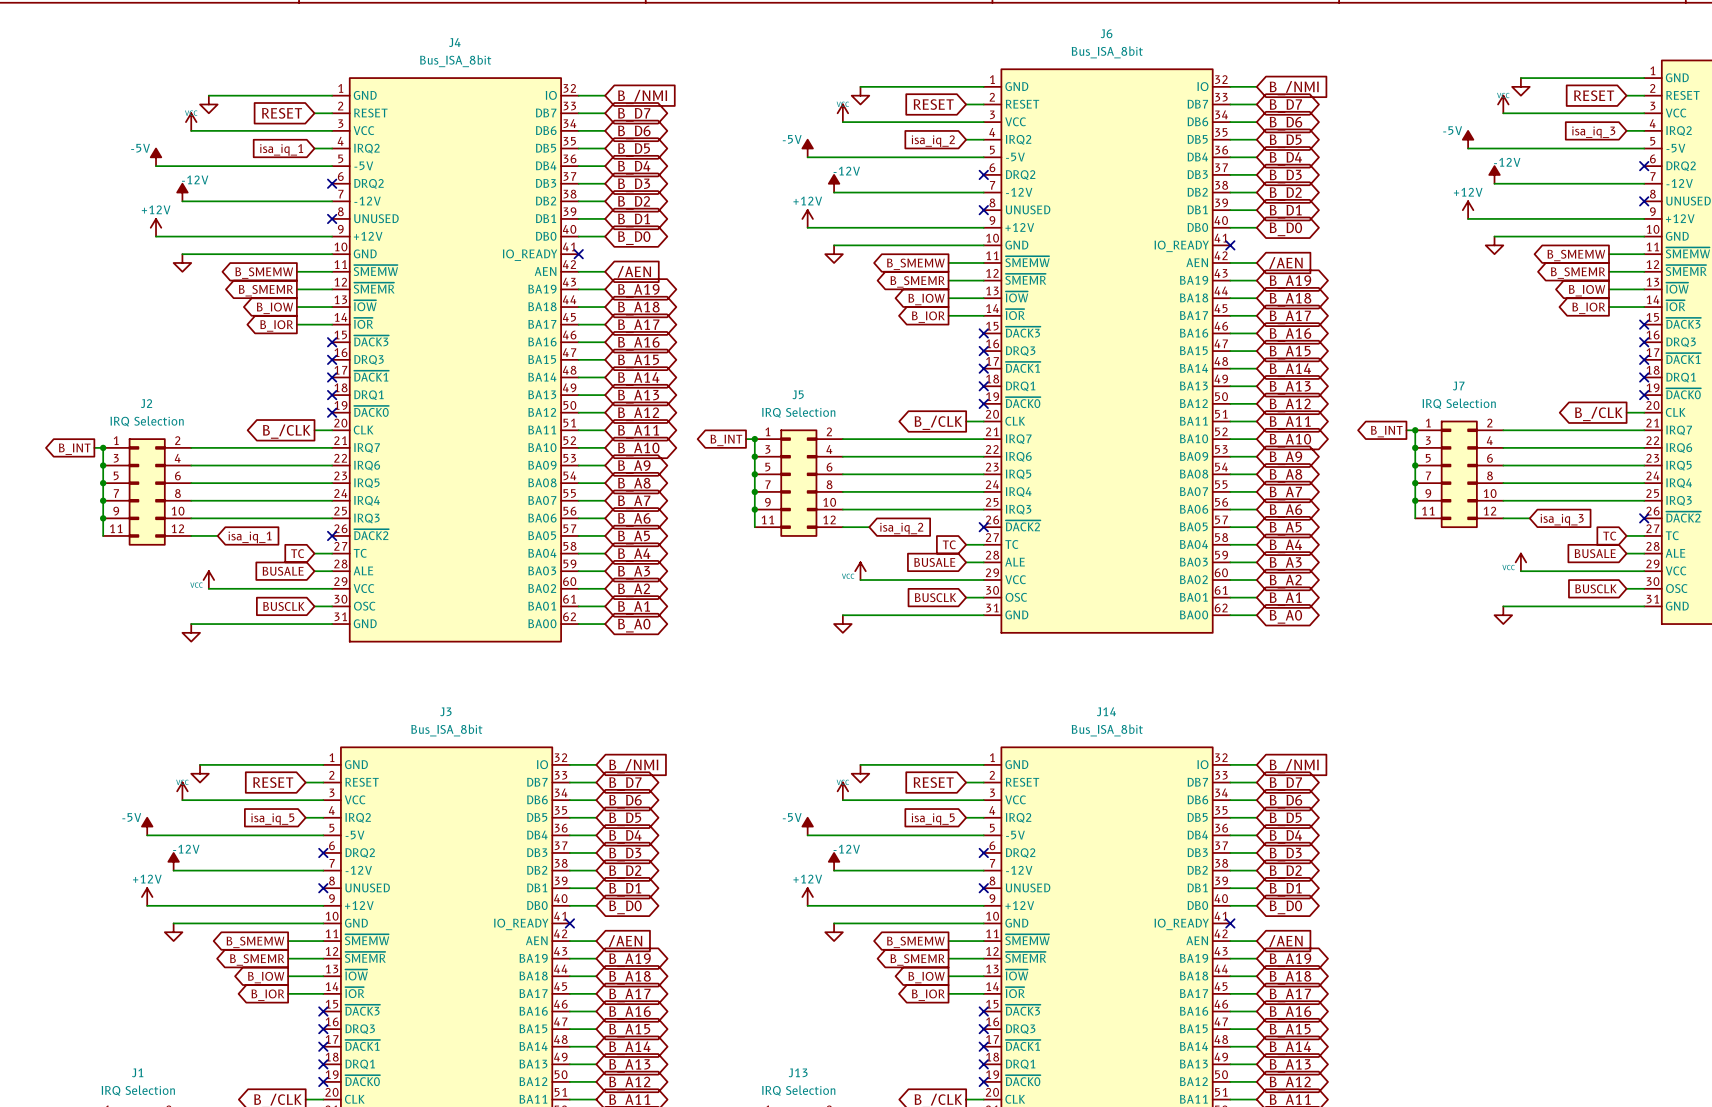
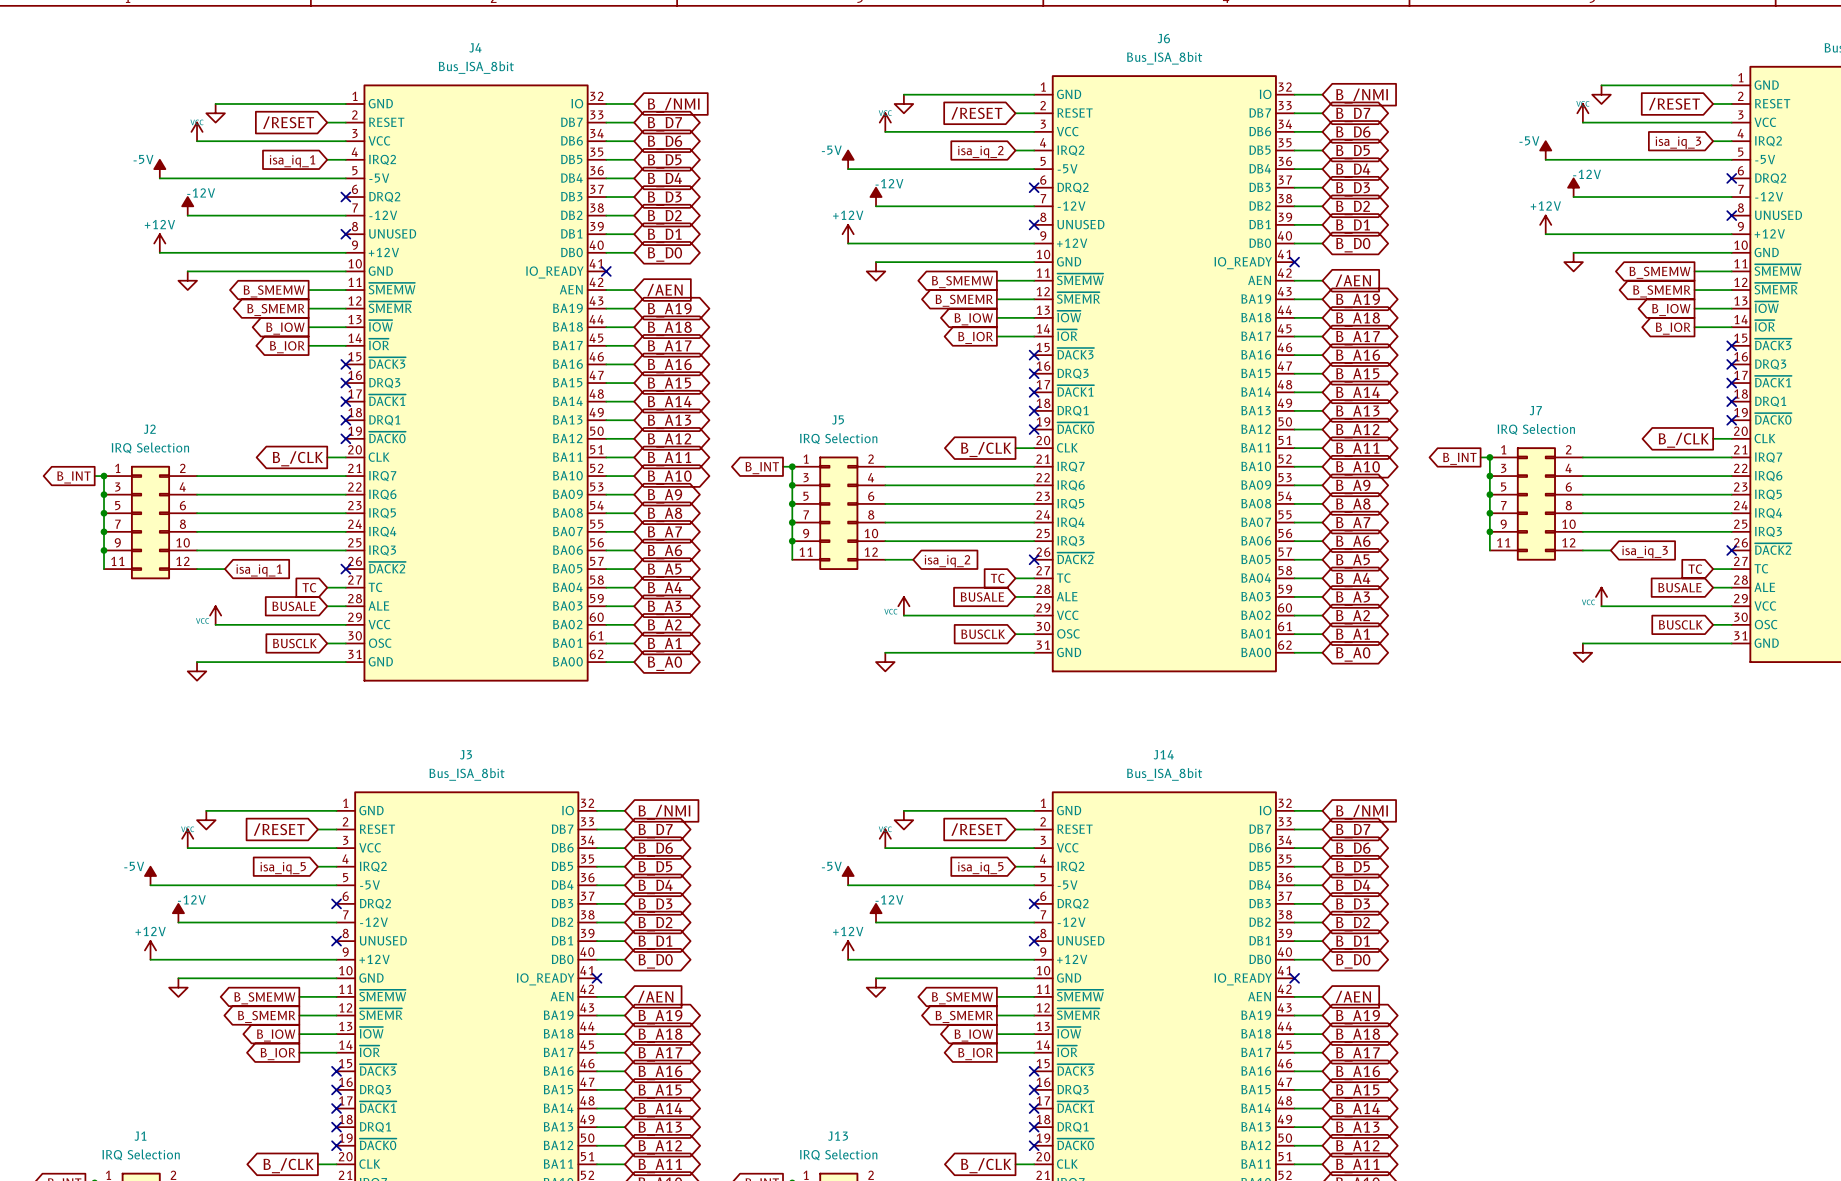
global label: RESET (1594, 95) -> /RESET (1674, 104)
global label: RESET (933, 104) -> /RESET (976, 113)
global label: RESET (282, 113) -> /RESET (288, 122)
global label: RESET (273, 782) -> /RESET (279, 829)
global label: RESET (933, 782) -> /RESET (976, 829)

